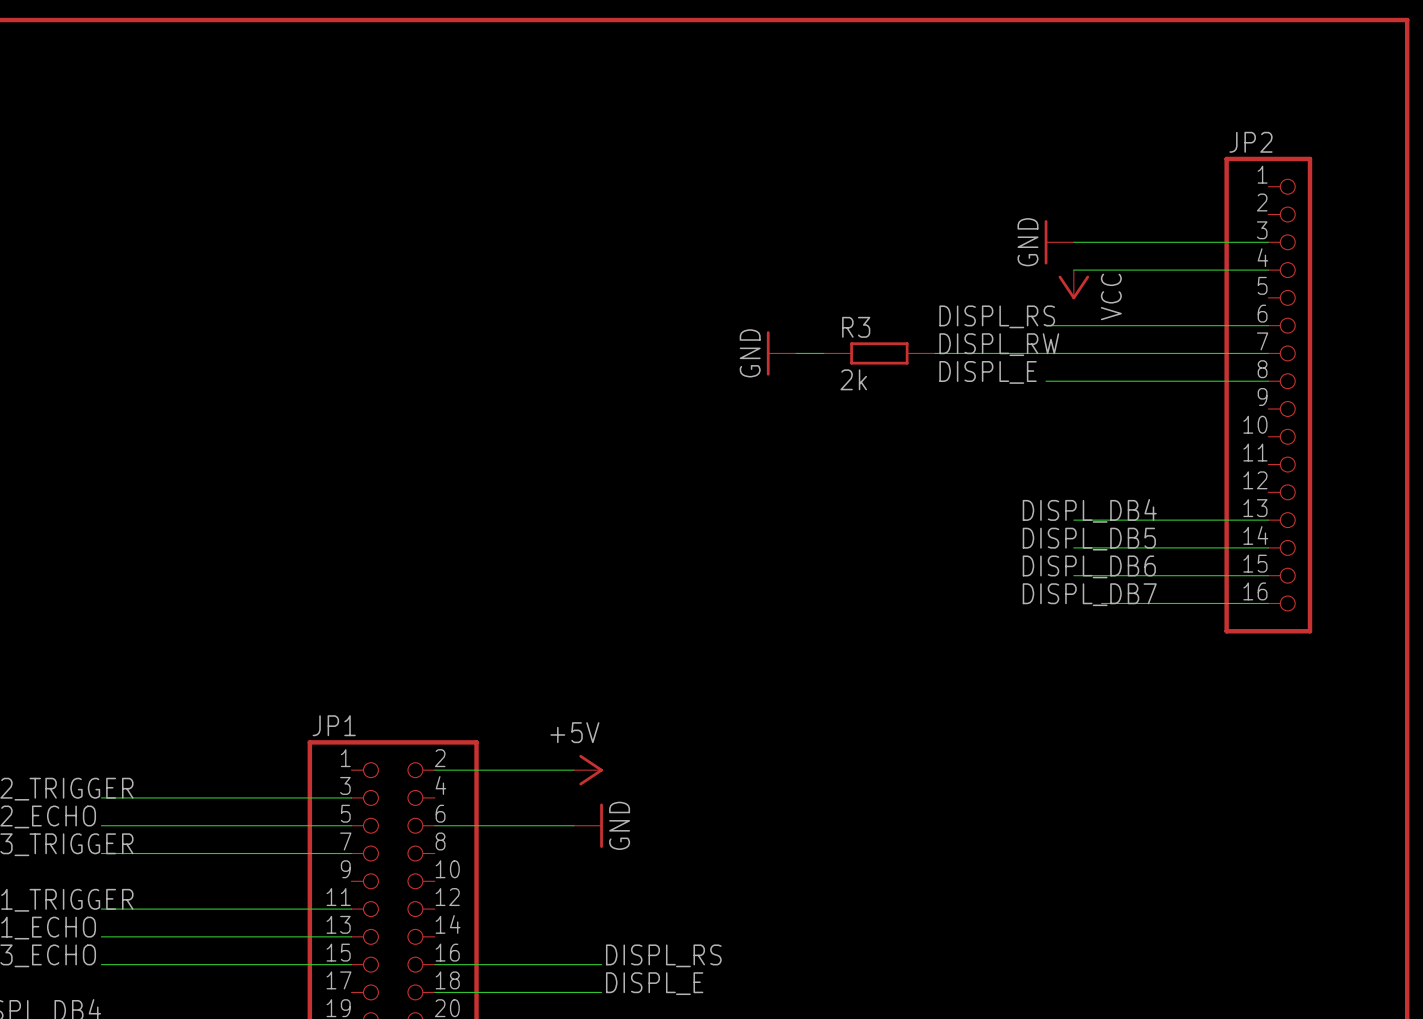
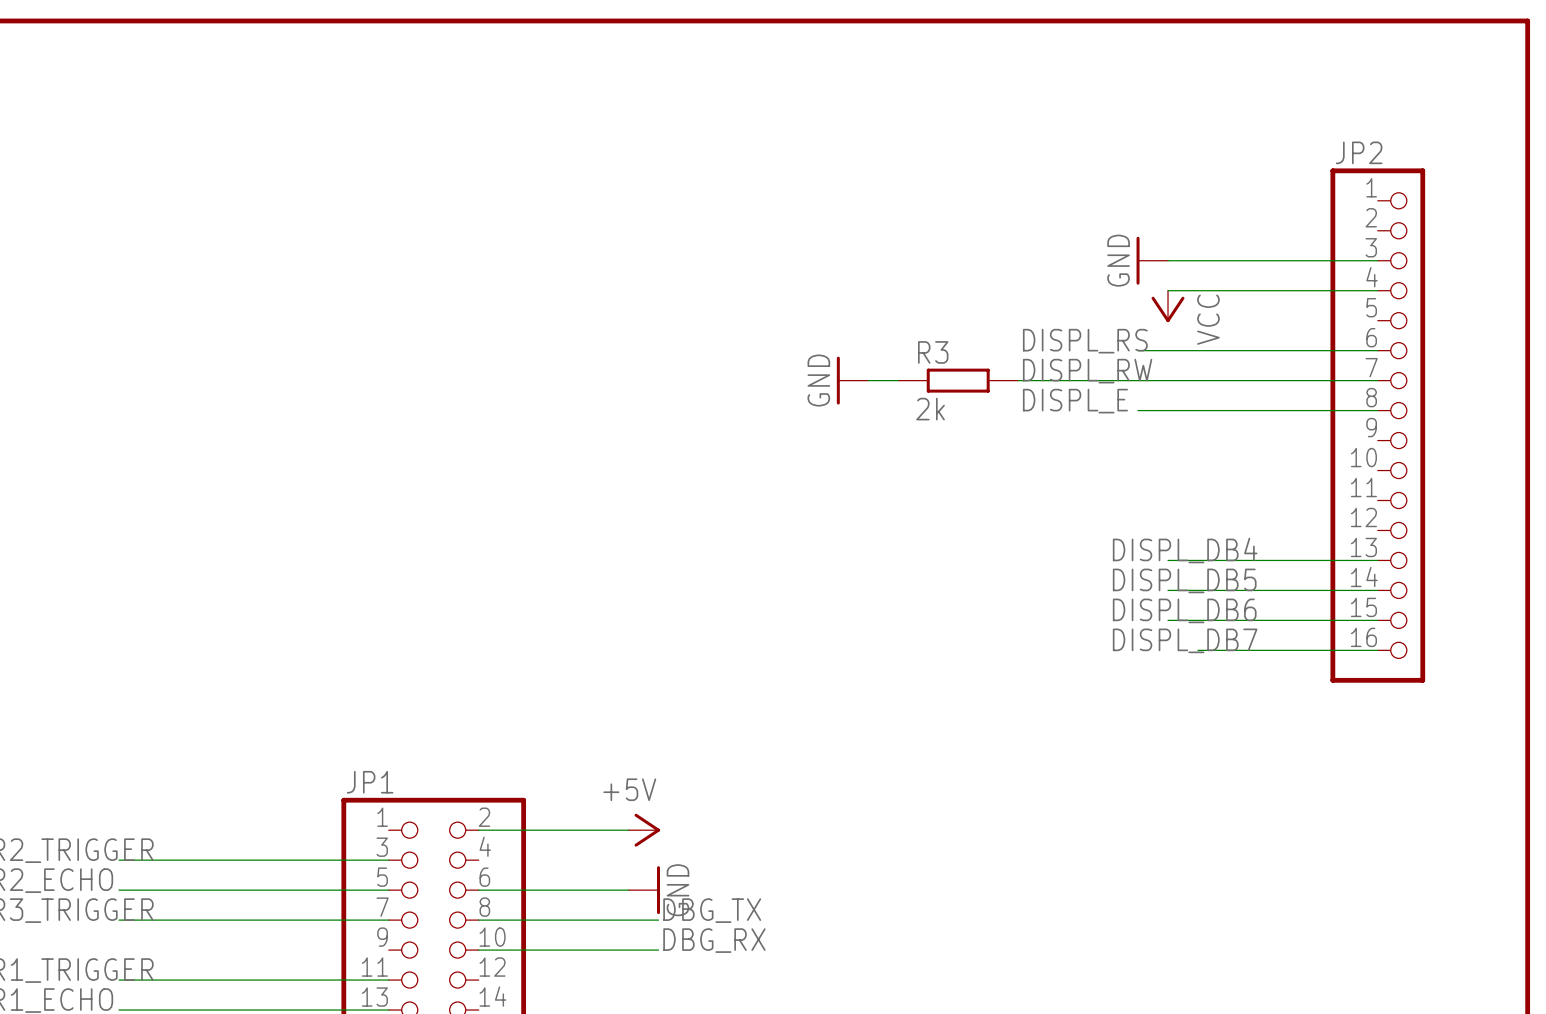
label: none -> DBG_TX (712, 910)
wire: none -> (478, 920) (658, 920)
label: none -> DBG_RX (714, 940)
wire: none -> (478, 950) (658, 950)

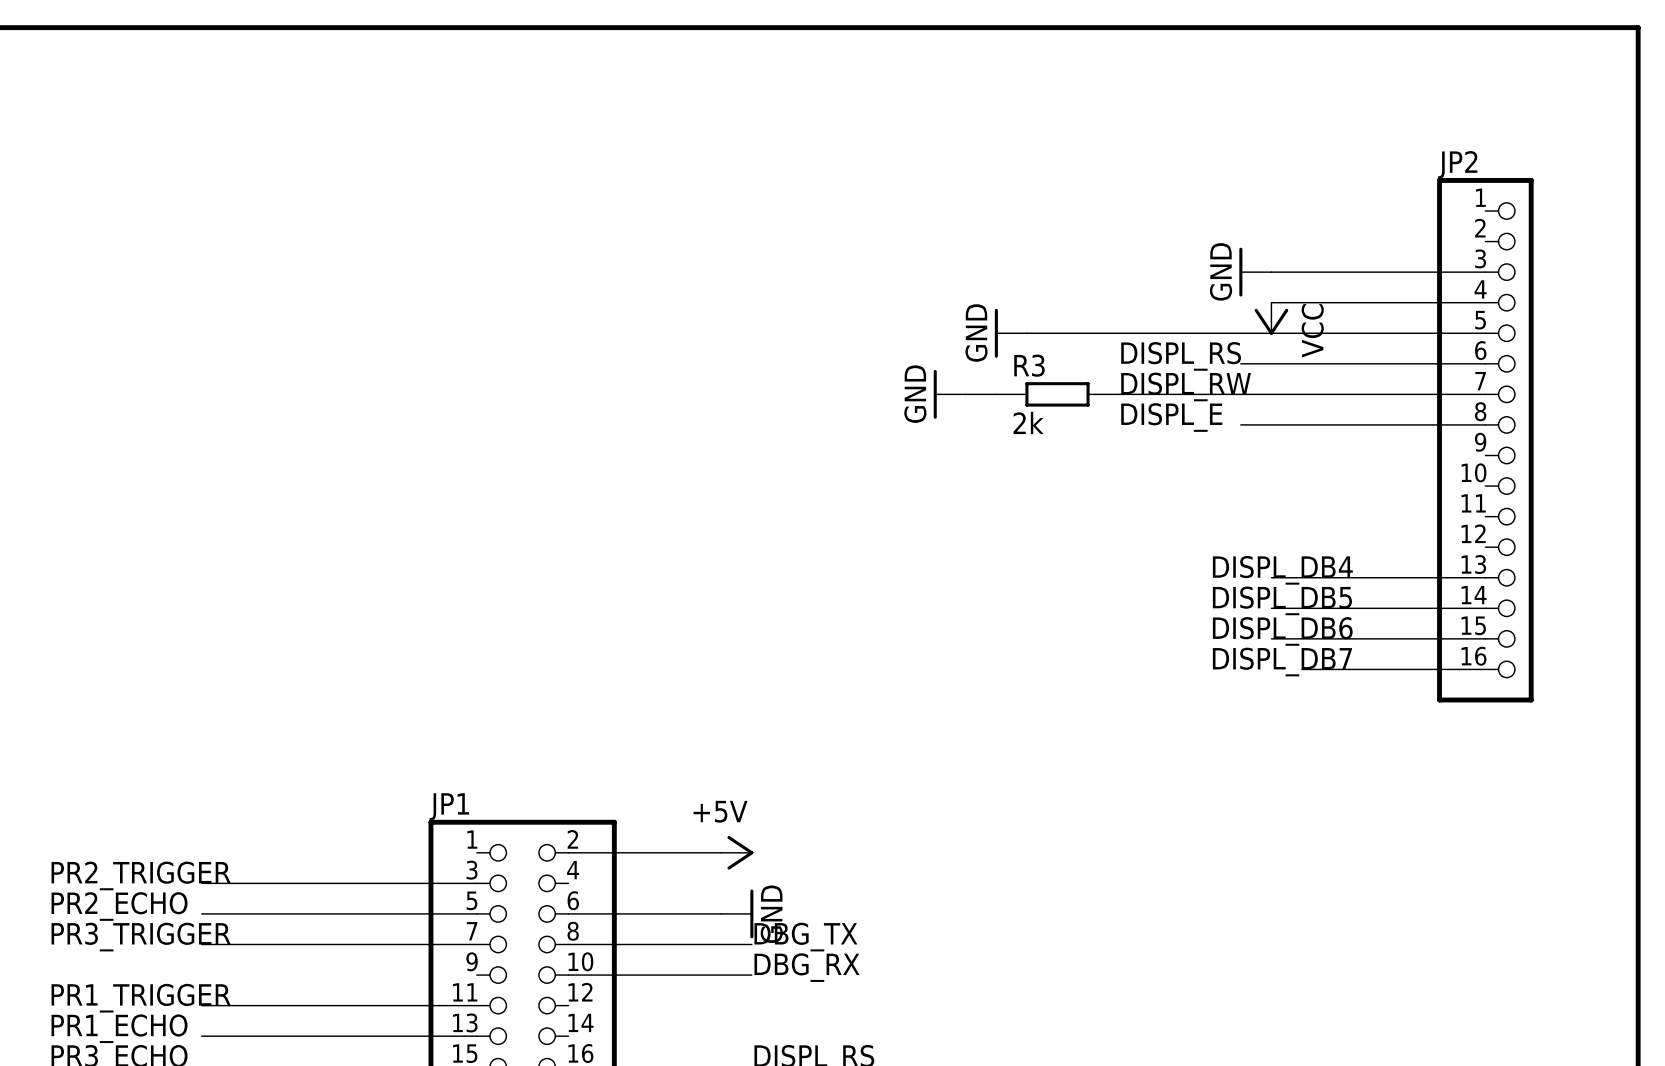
power symbol: none -> GND (1010, 333)
wire: none -> (1026, 333) (1485, 333)

